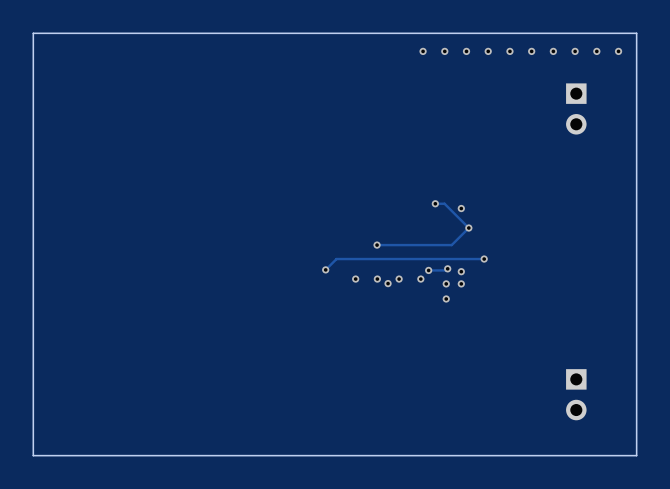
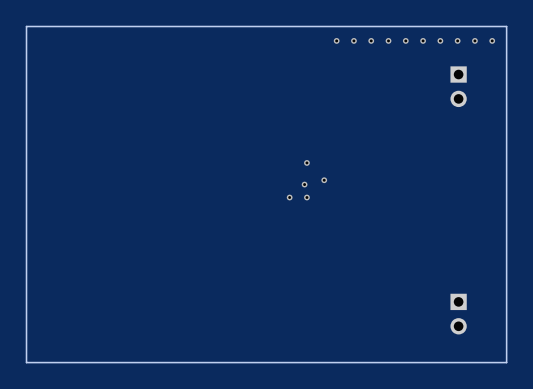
track: (435, 203) (444, 203) (468, 228) (451, 245) (377, 245) -> none
via: (435, 203) -> none
via: none -> (306, 162)
via: (461, 208) -> none
via: none -> (324, 180)
via: (468, 228) -> none
via: none -> (304, 184)
via: (377, 245) -> none
via: none -> (289, 197)
via: none -> (306, 197)
track: (484, 259) (336, 259) (325, 269) -> none
via: (484, 259) -> none
track: (447, 268) (428, 270) -> none
via: (447, 268) -> none
via: (325, 269) -> none
via: (428, 270) -> none
via: (461, 271) -> none
via: (355, 279) -> none
via: (377, 279) -> none
via: (399, 279) -> none
via: (420, 279) -> none
via: (388, 283) -> none
via: (446, 283) -> none
via: (461, 283) -> none
via: (446, 298) -> none

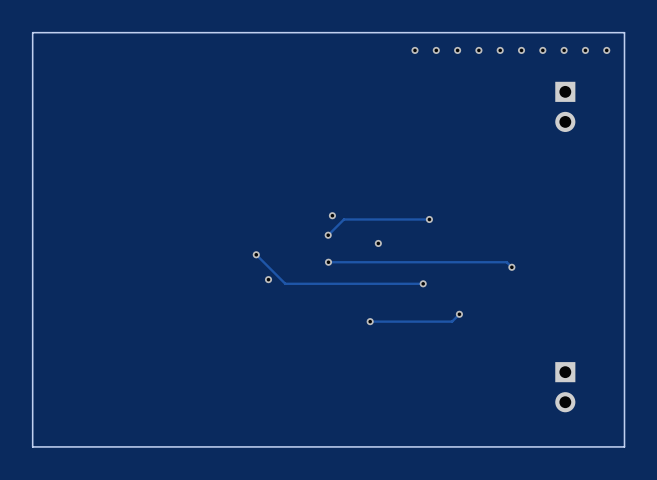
via: (306, 162) -> none
via: none -> (332, 215)
track: none -> (429, 219) (343, 219) (328, 235)
via: none -> (429, 219)
via: (324, 180) -> none
via: (304, 184) -> none
via: none -> (328, 235)
via: (289, 197) -> none
track: none -> (256, 254) (285, 283) (423, 283)
via: none -> (256, 254)
track: none -> (328, 262) (506, 262) (511, 267)
via: none -> (328, 262)
via: none -> (511, 267)
via: none -> (268, 279)
via: none -> (423, 283)
track: none -> (459, 314) (452, 321) (370, 321)
via: none -> (459, 314)
via: none -> (370, 321)

